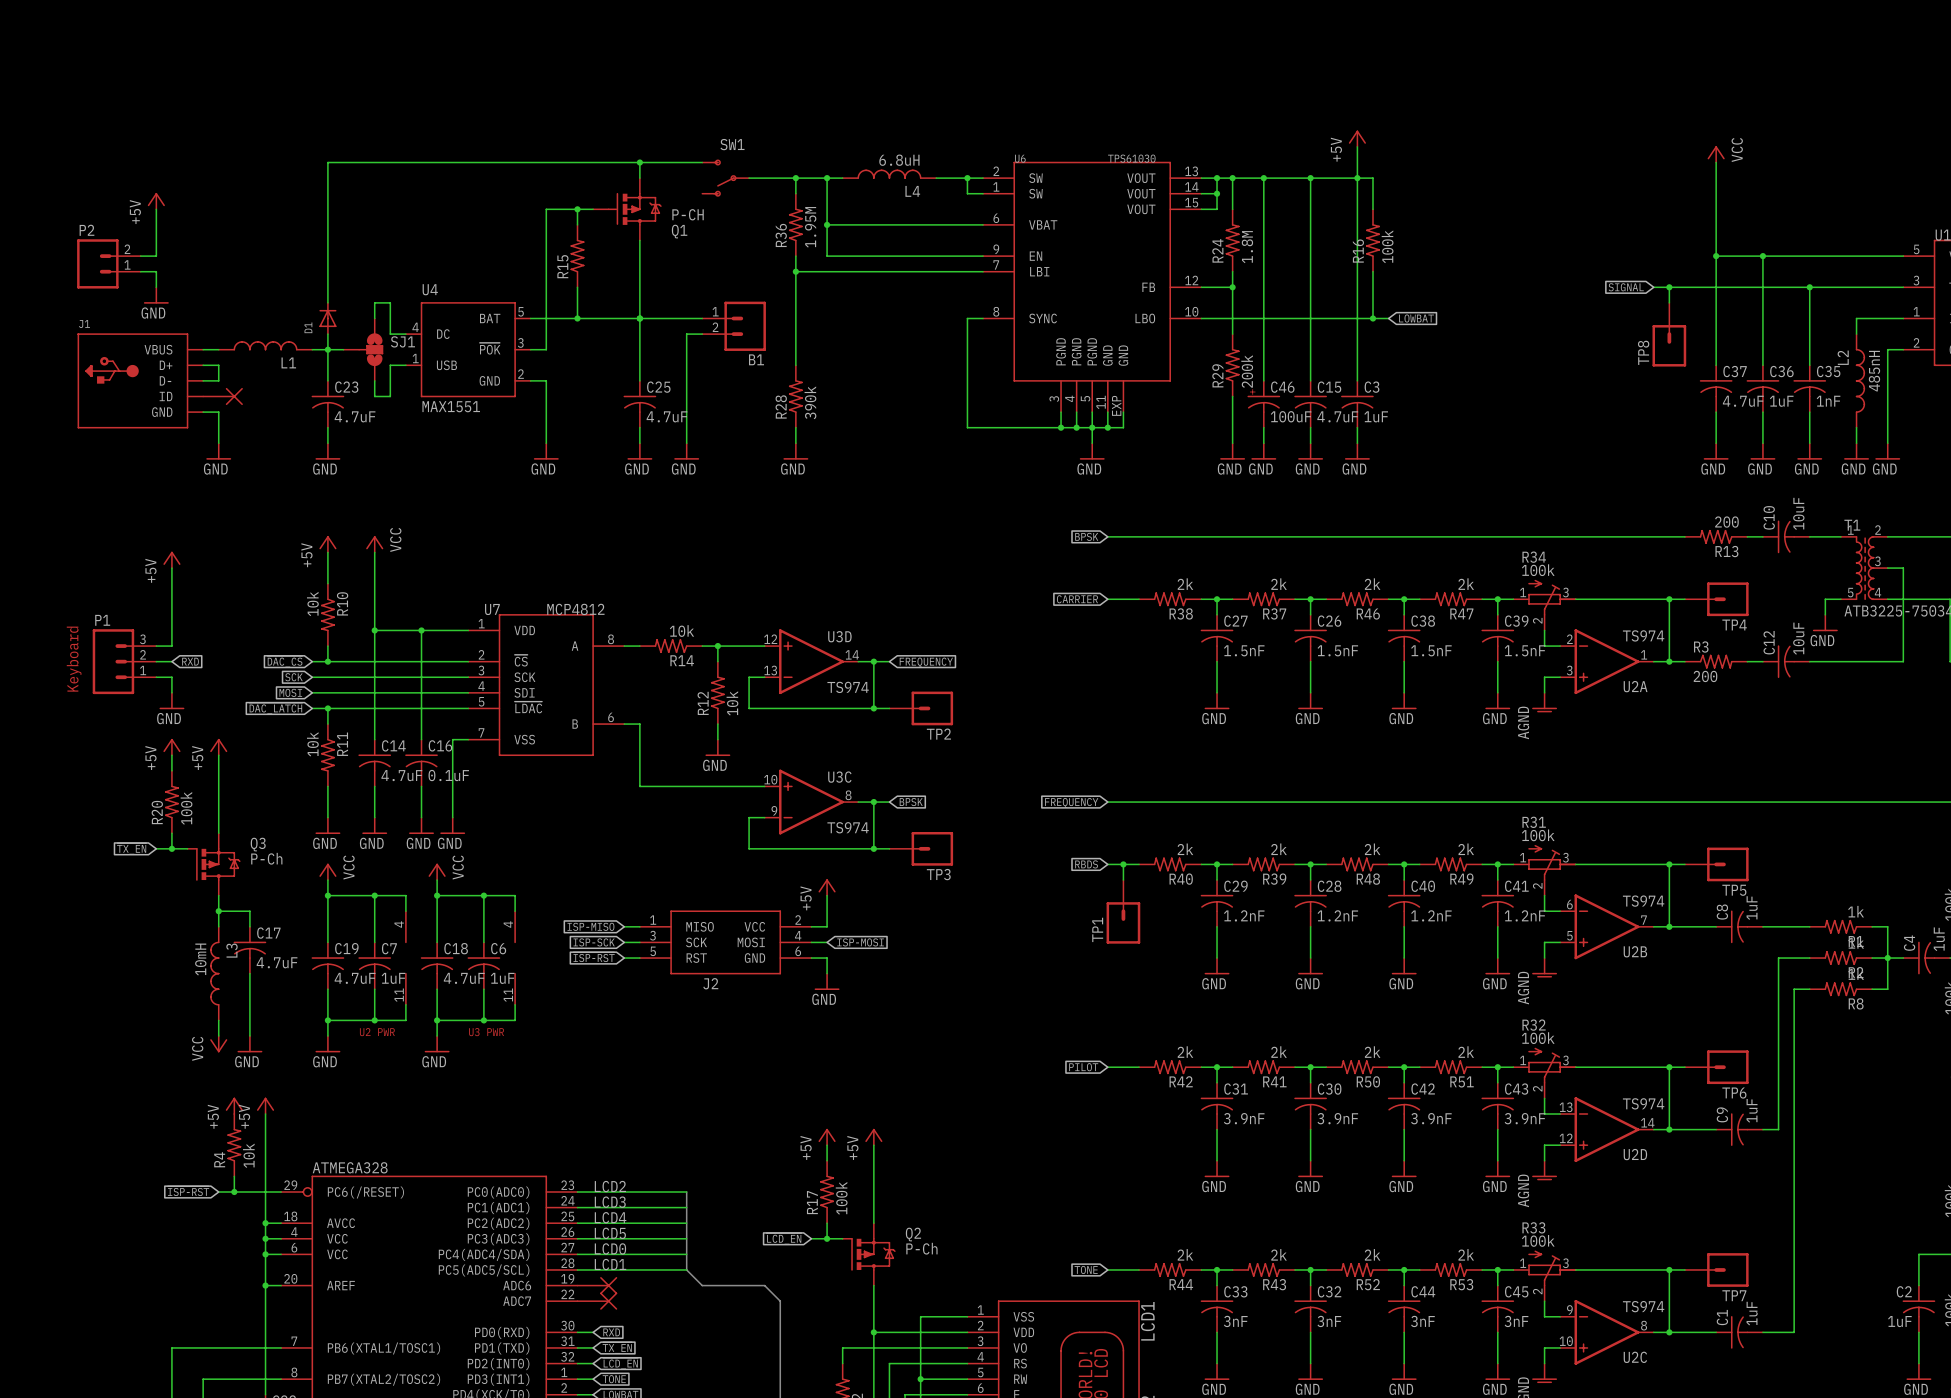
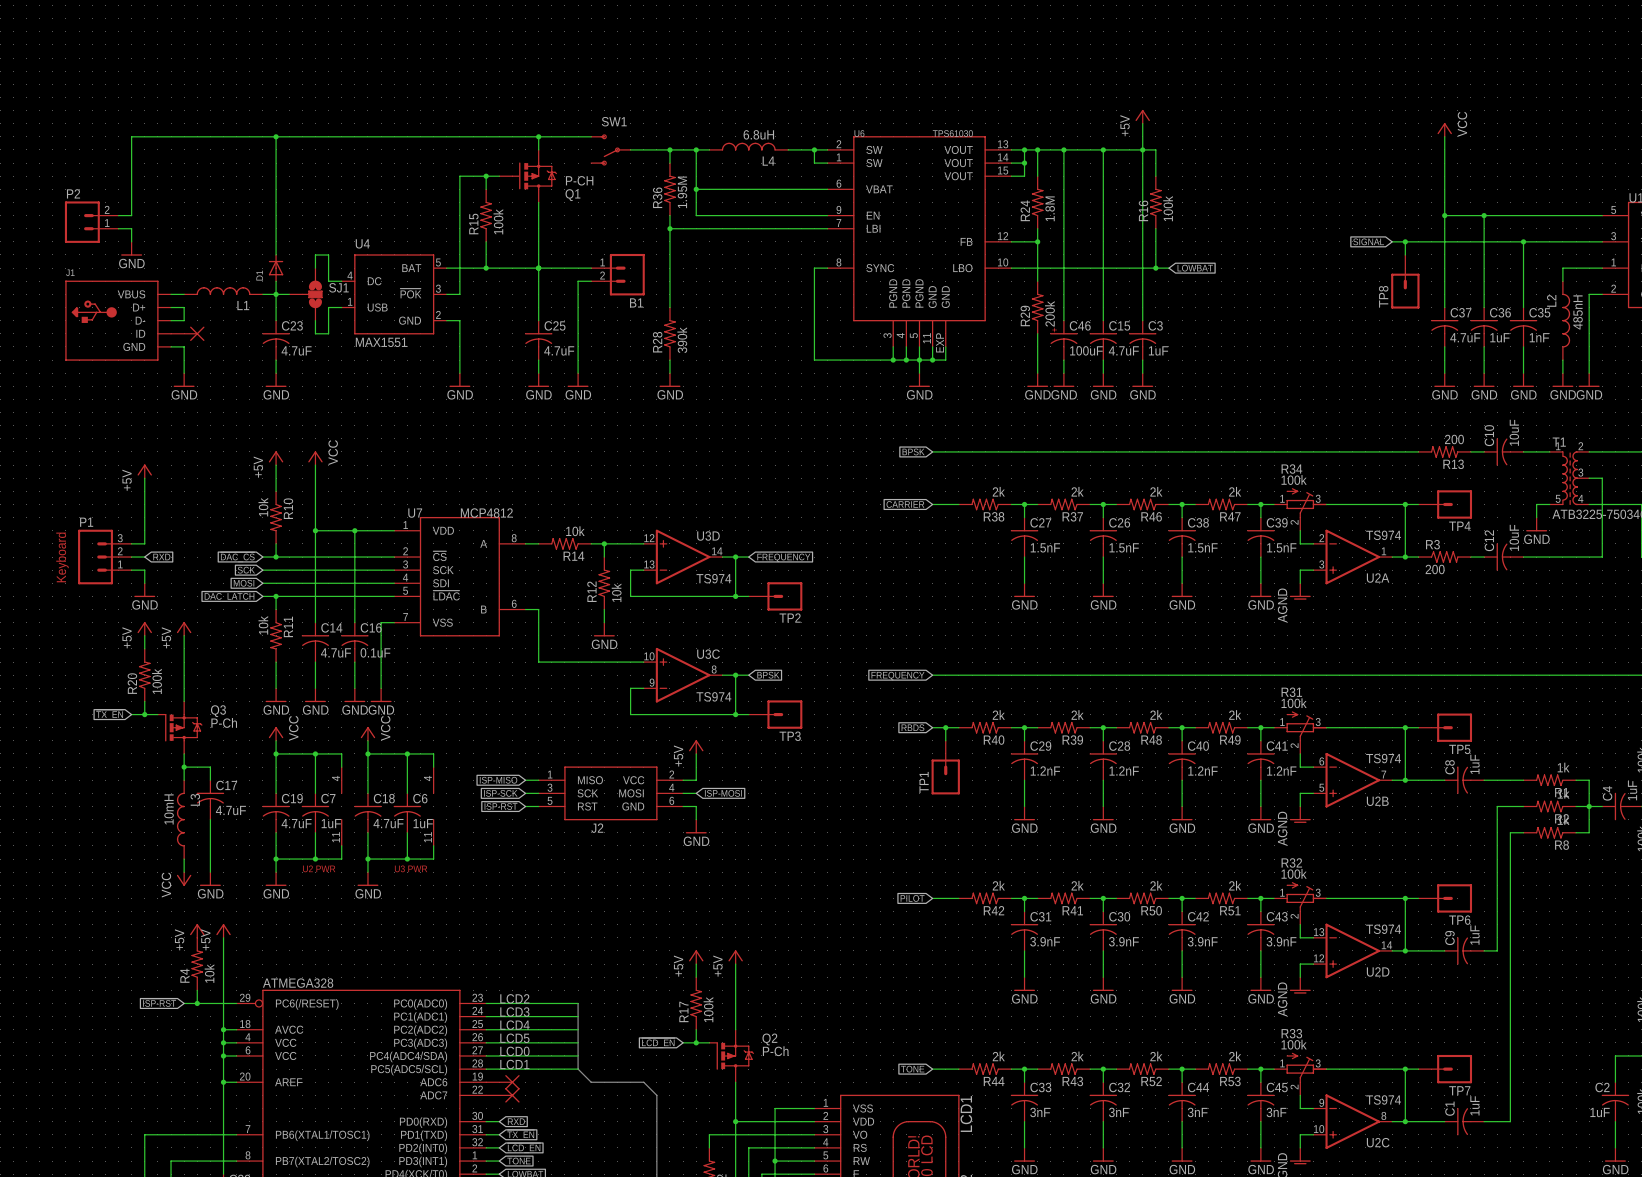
wire: none -> (276, 136) (131, 136) (131, 176)
junction: none -> (276, 136)
power symbol: +5V (156, 201) -> none
R15 value: none -> 100k (498, 221)

